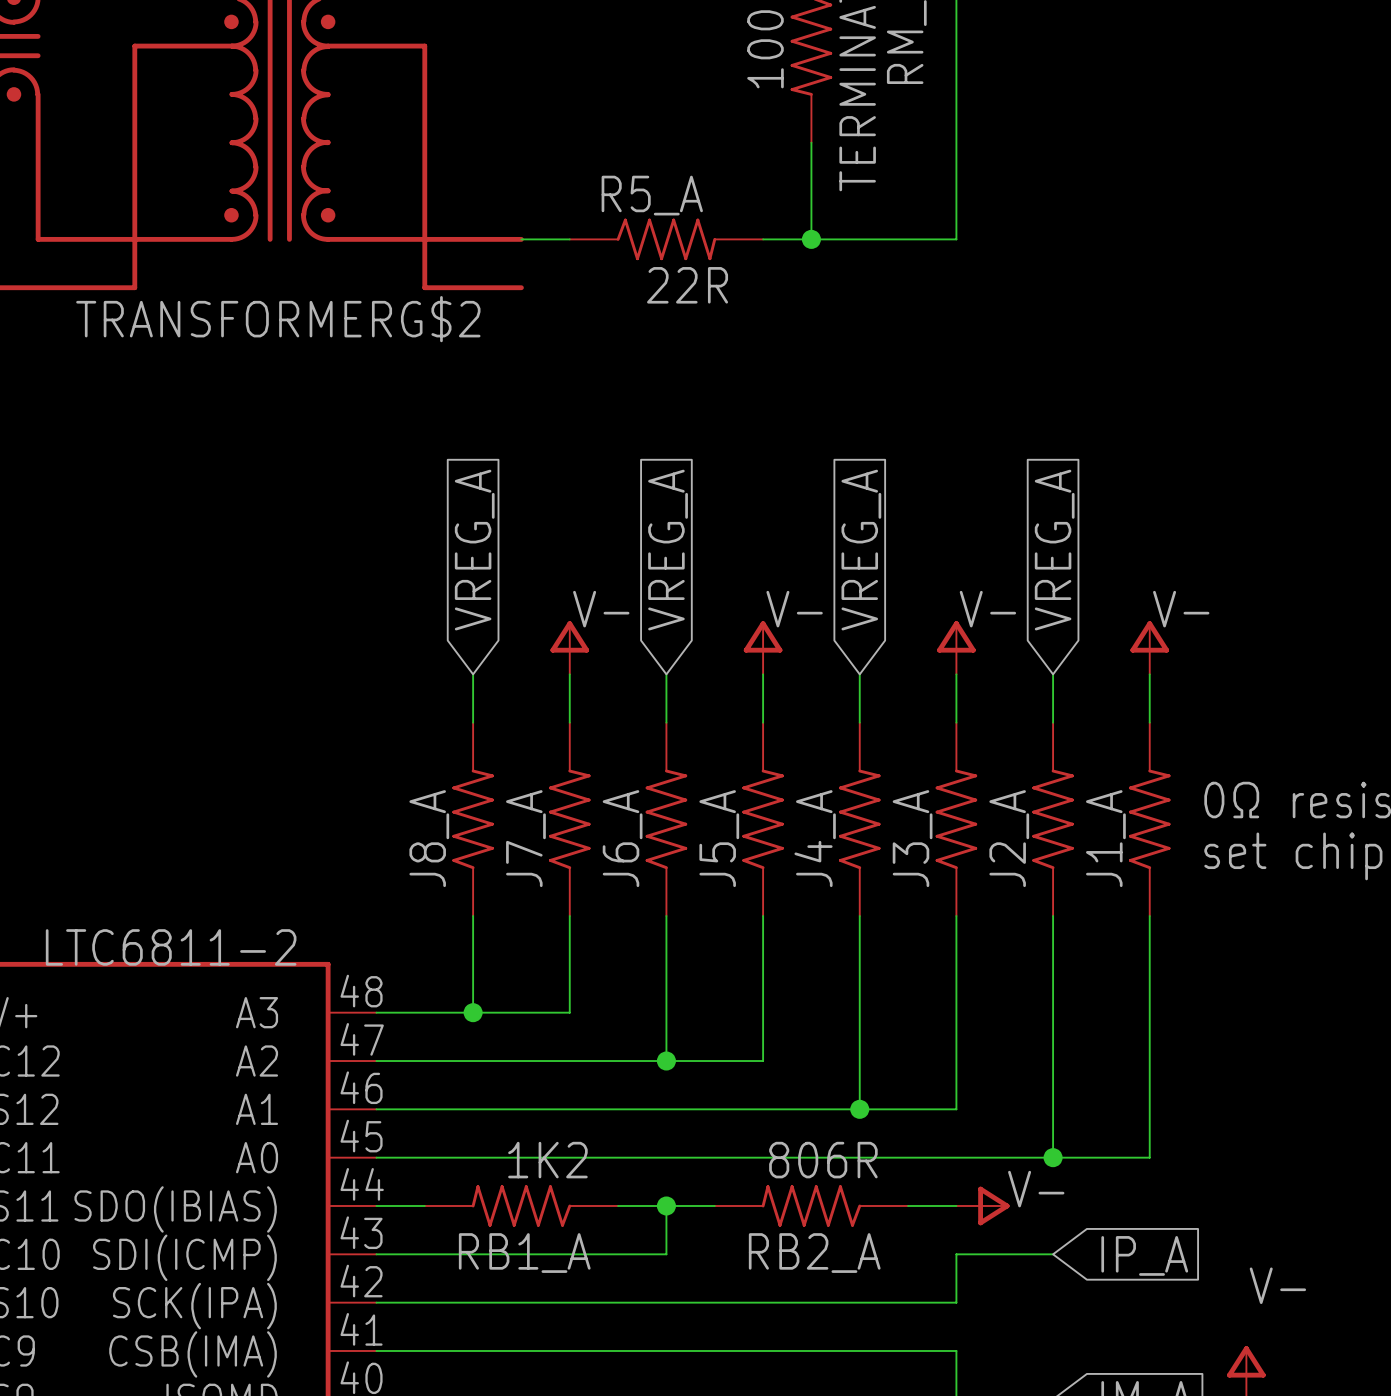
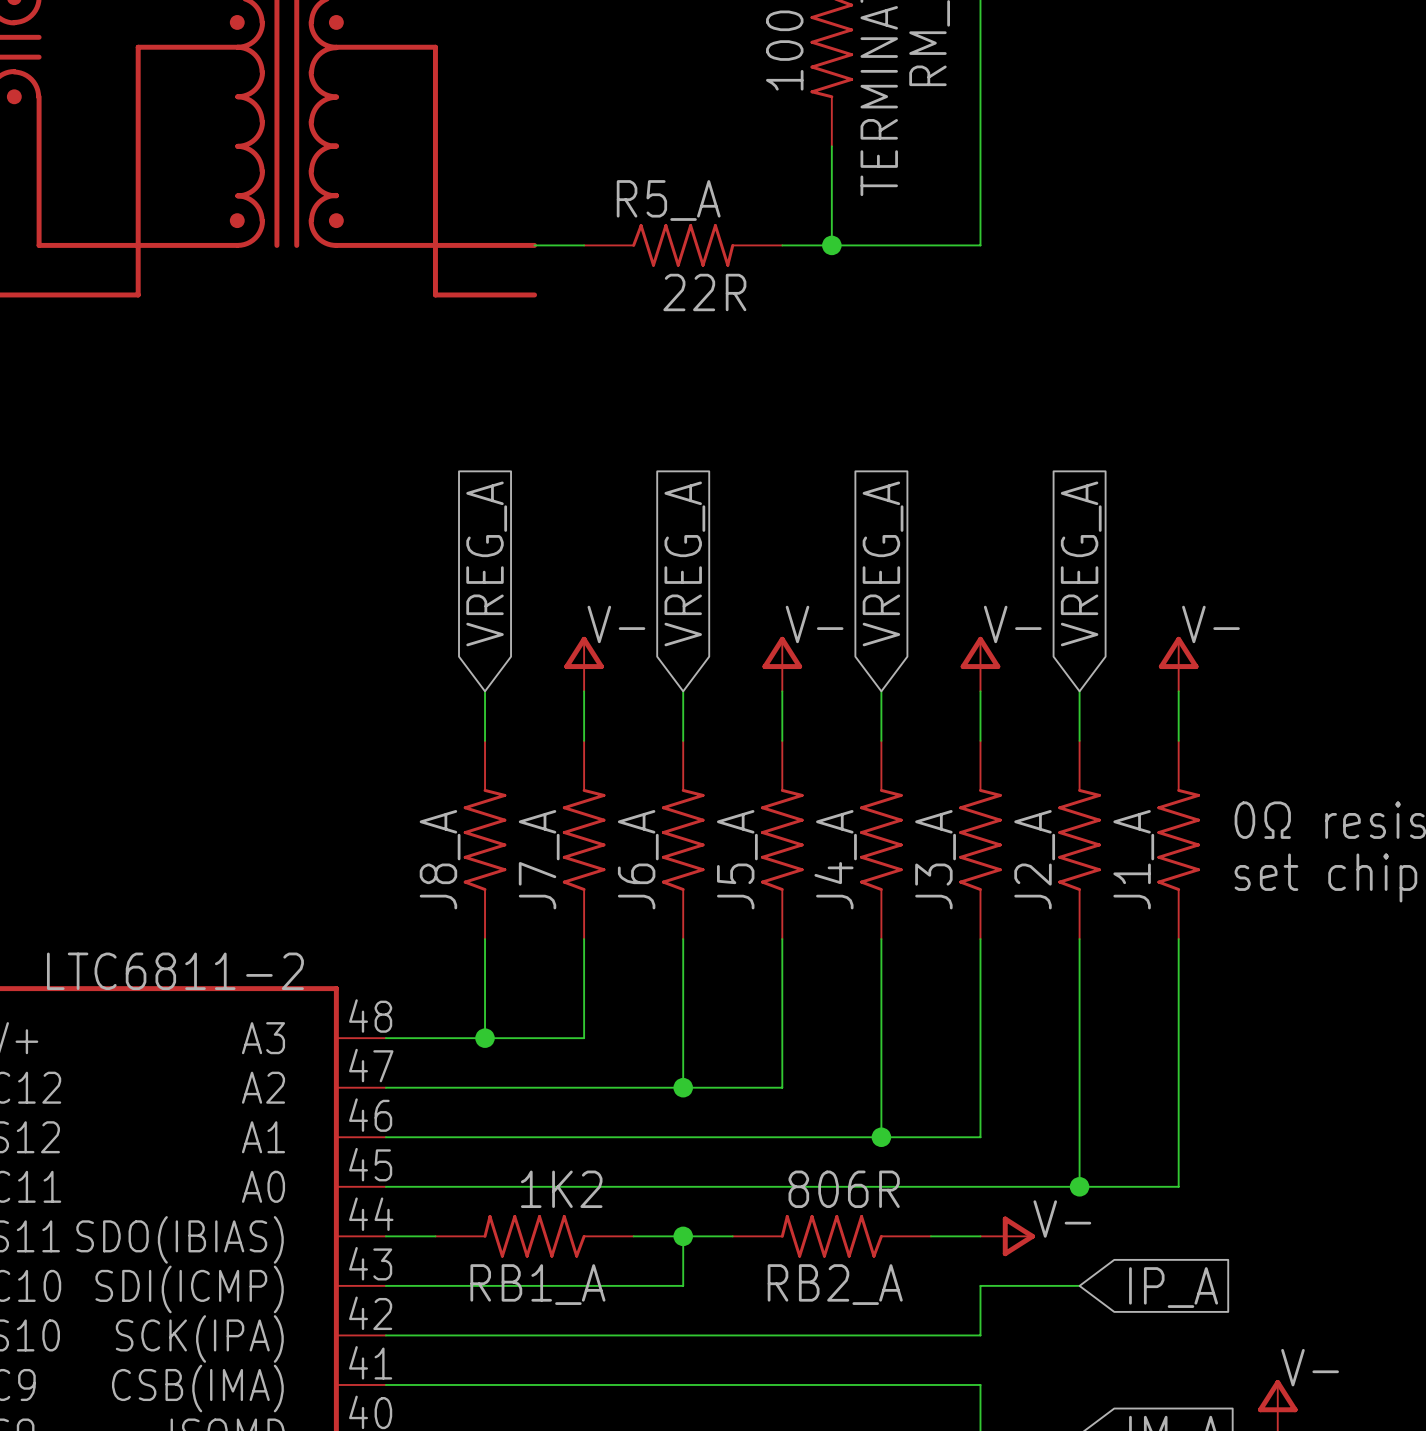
TRANSFORMERG$2 name: TRANSFORMERG$2 (278, 319) -> none
power symbol text position: V- (1277, 1285) -> V- (1310, 1367)

